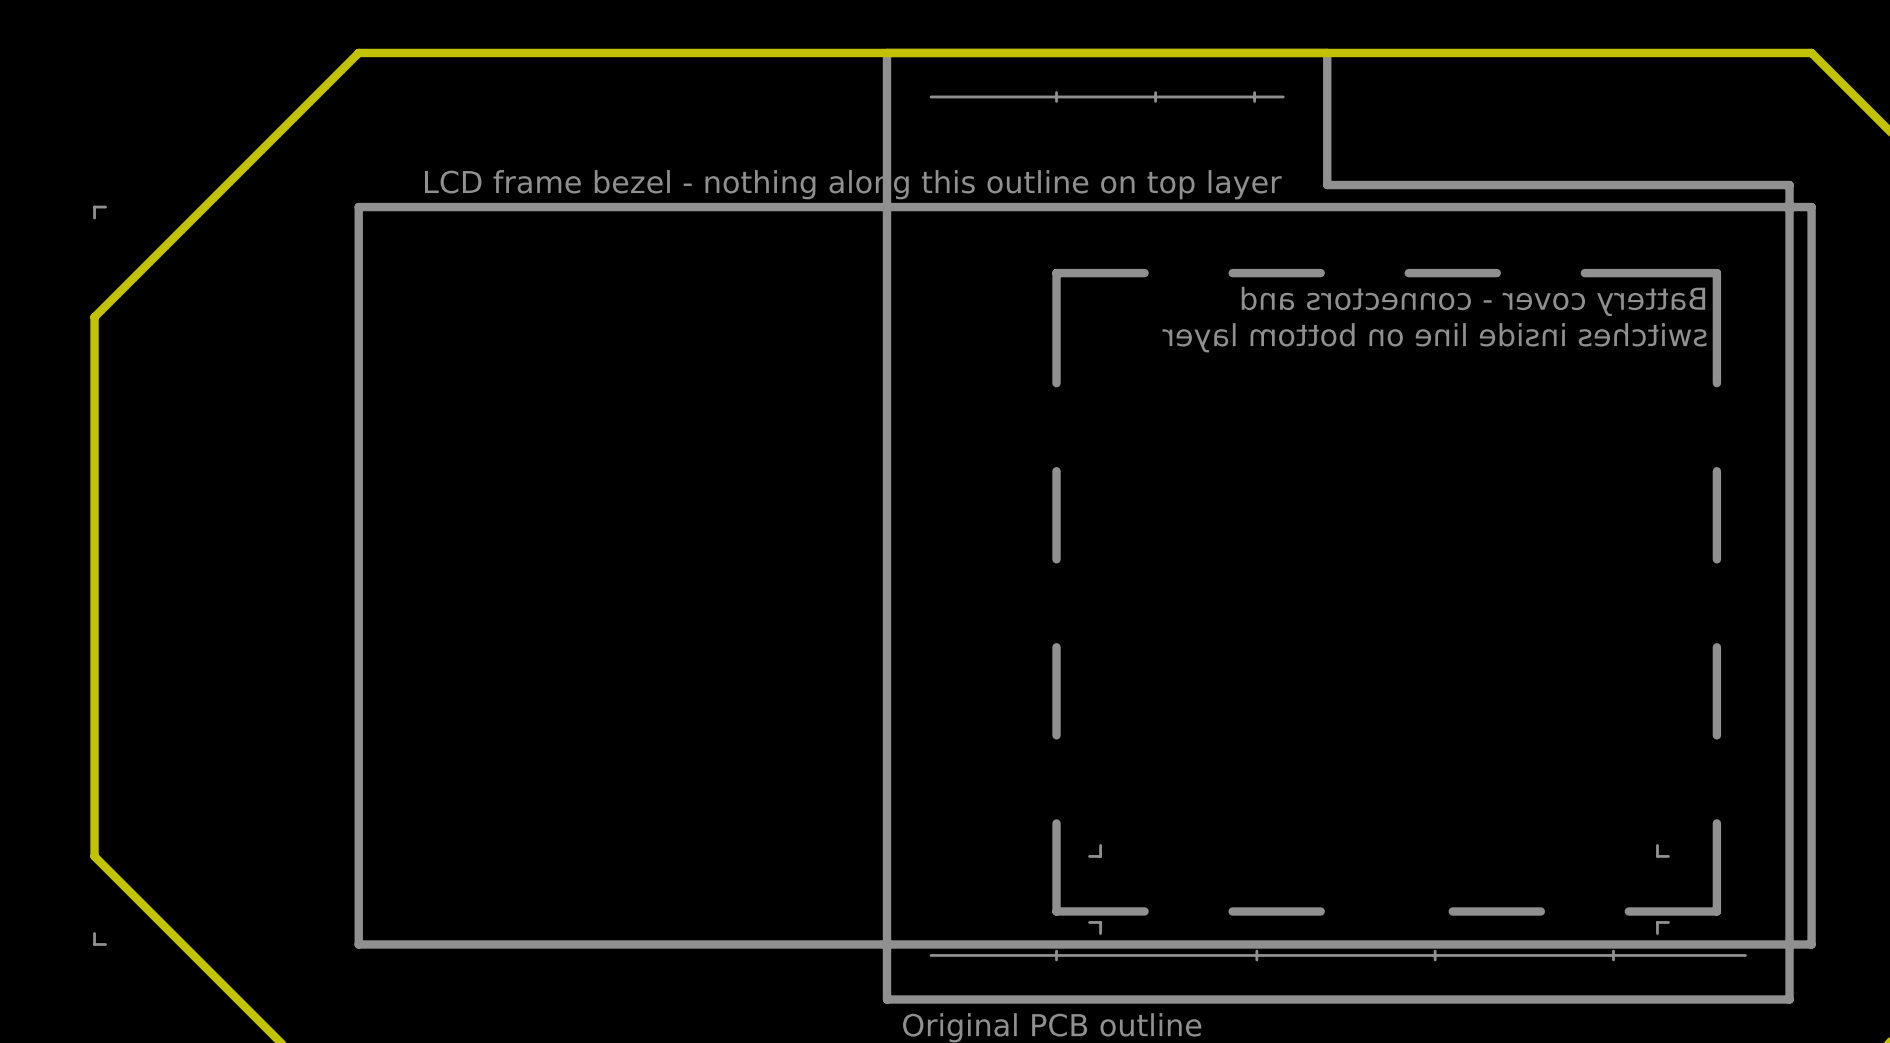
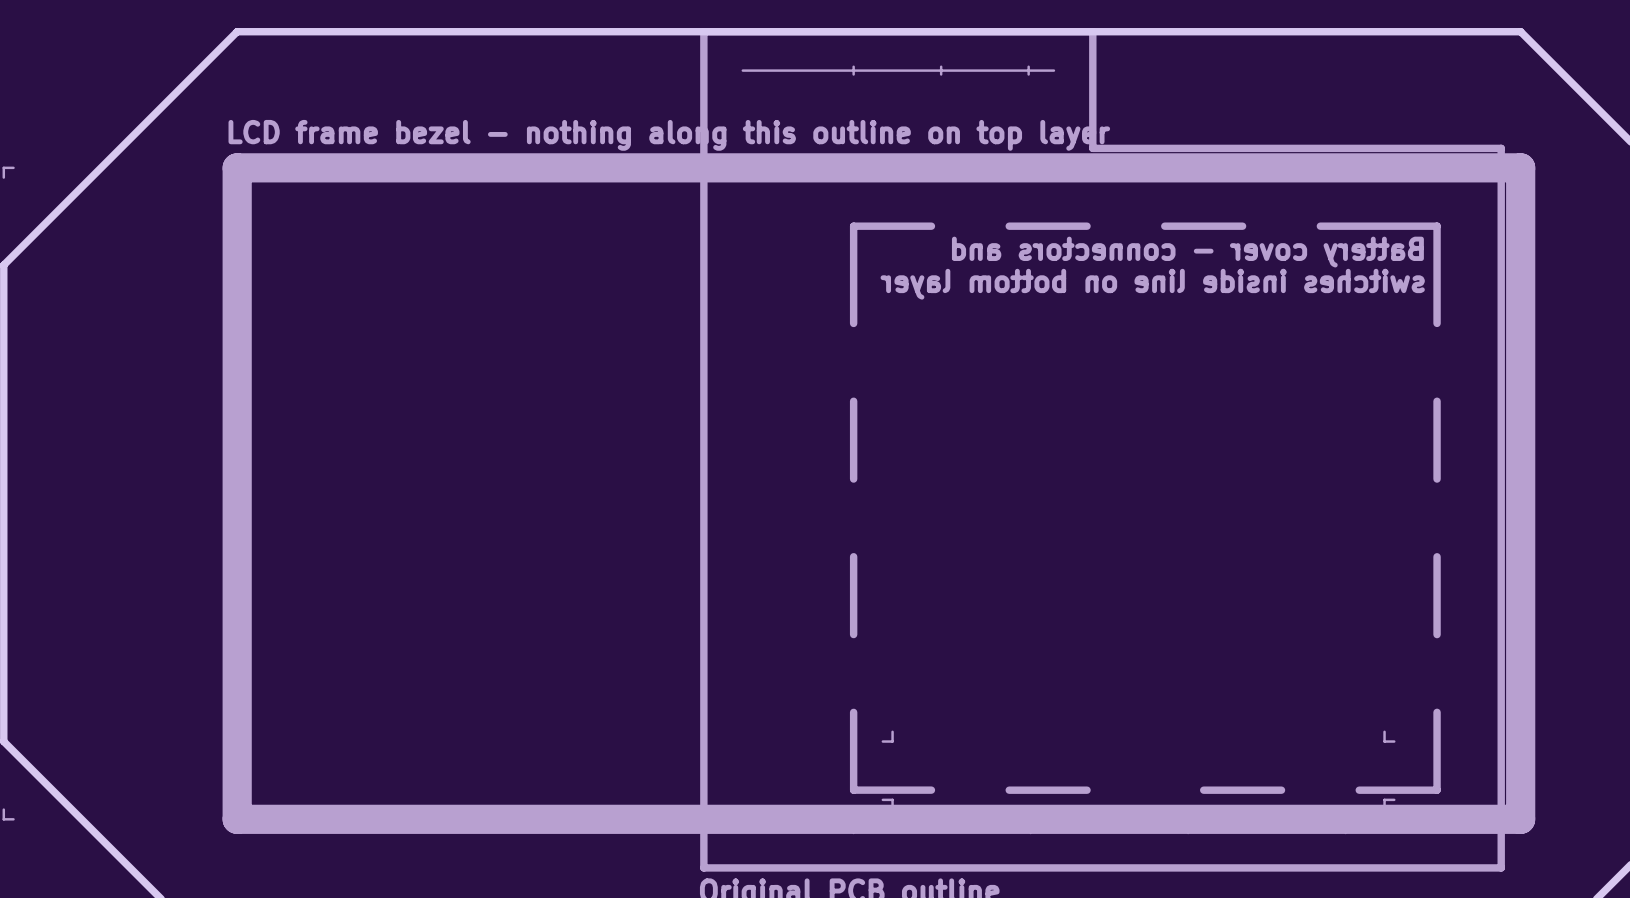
text position: LCD frame bezel - nothing along this outline on top layer (853, 184) -> LCD frame bezel - nothing along this outline on top layer (669, 135)
line width: thin (358, 207) (358, 944) (1811, 944) (1811, 207) (358, 207) -> thick (237, 167) (237, 819) (1520, 819) (1520, 167) (237, 167)

